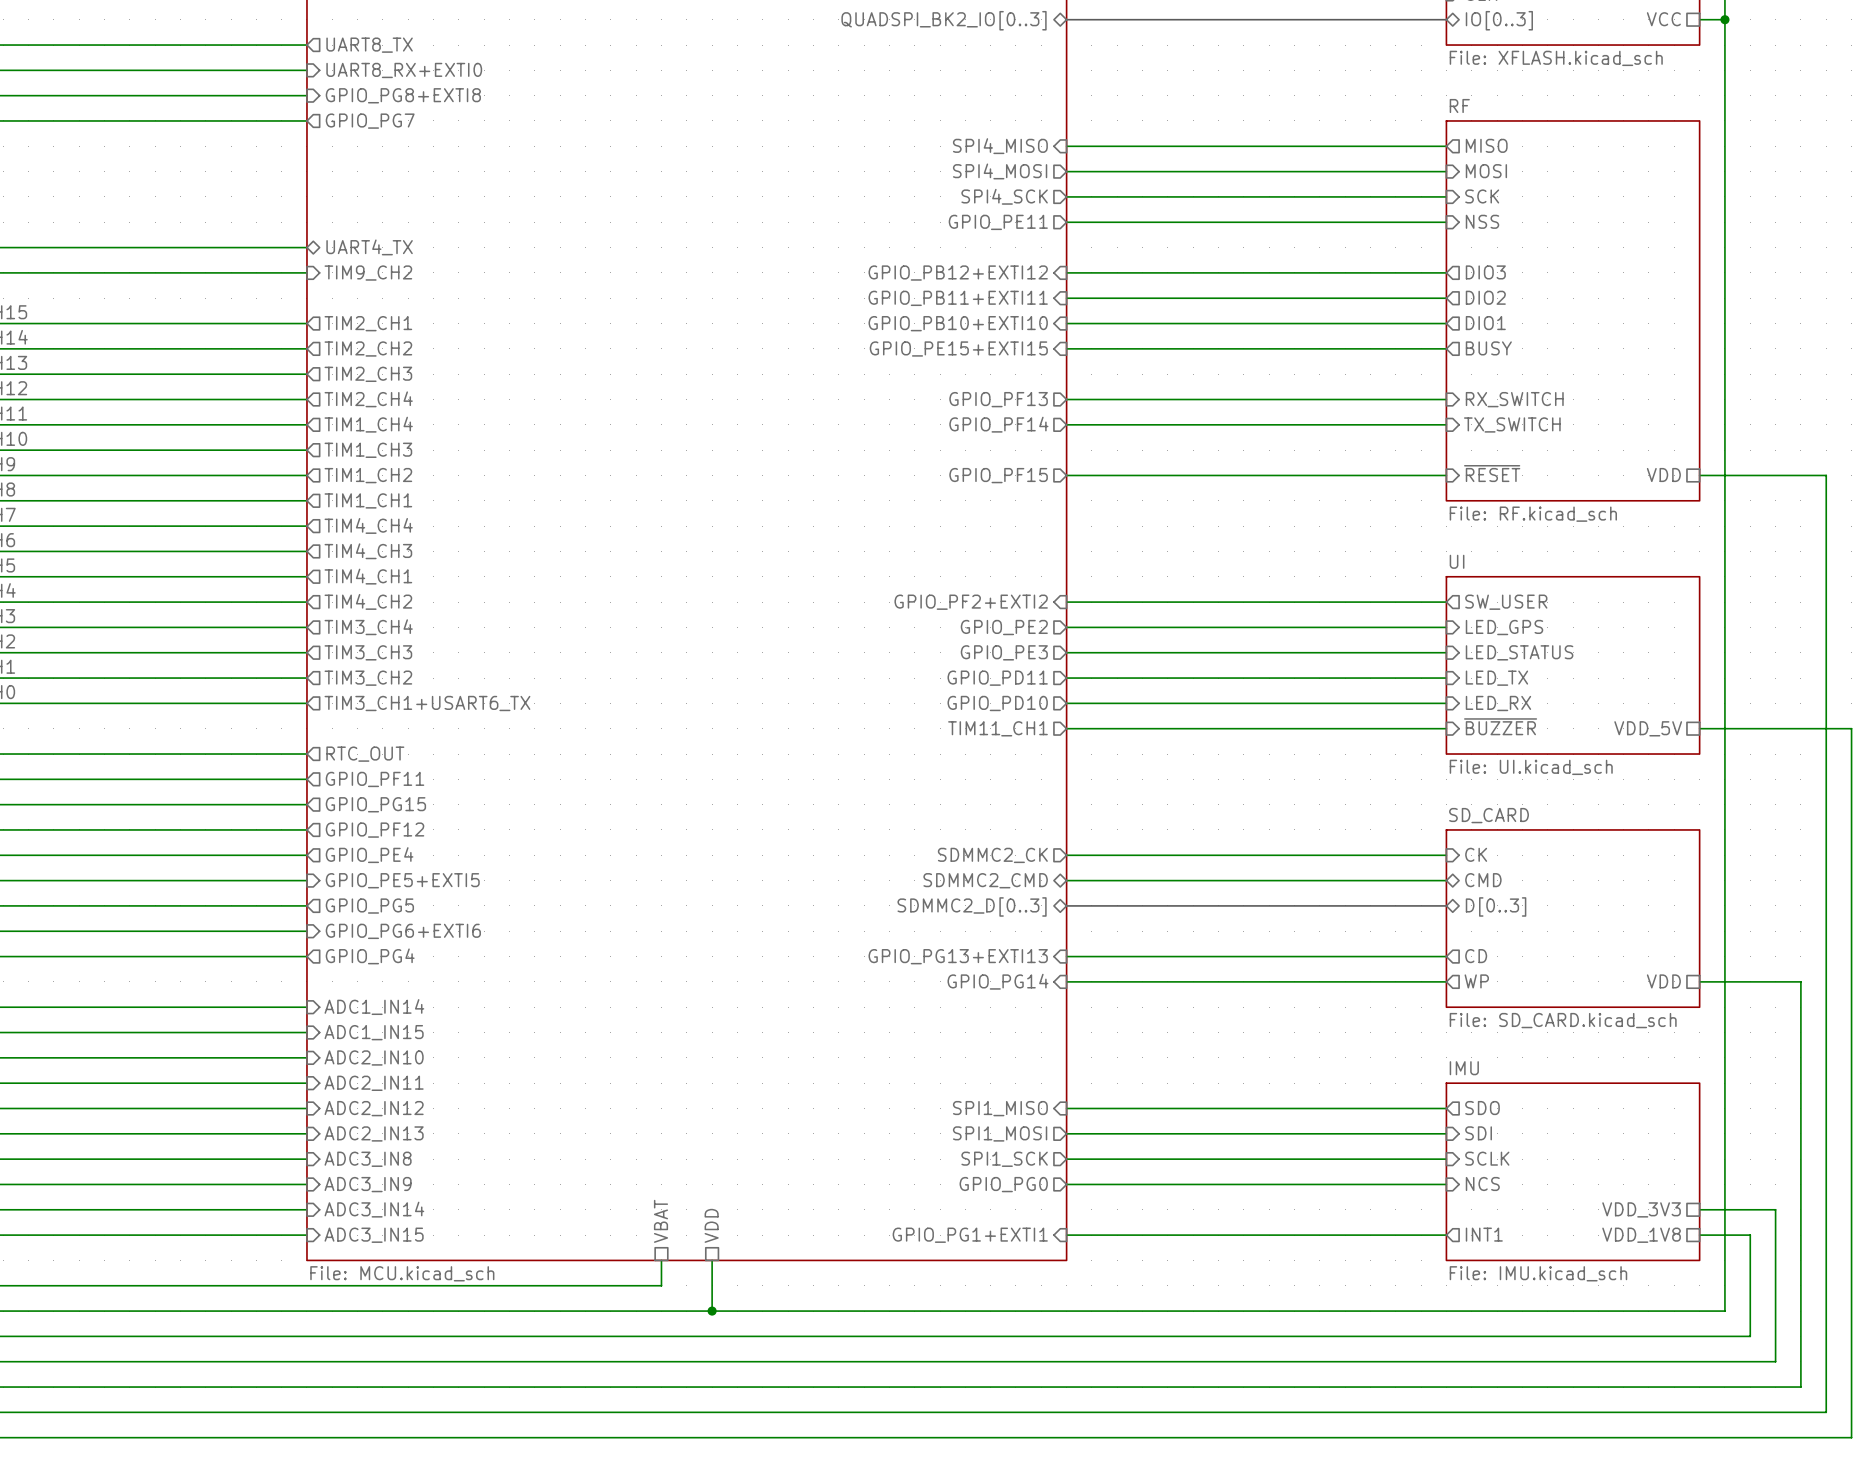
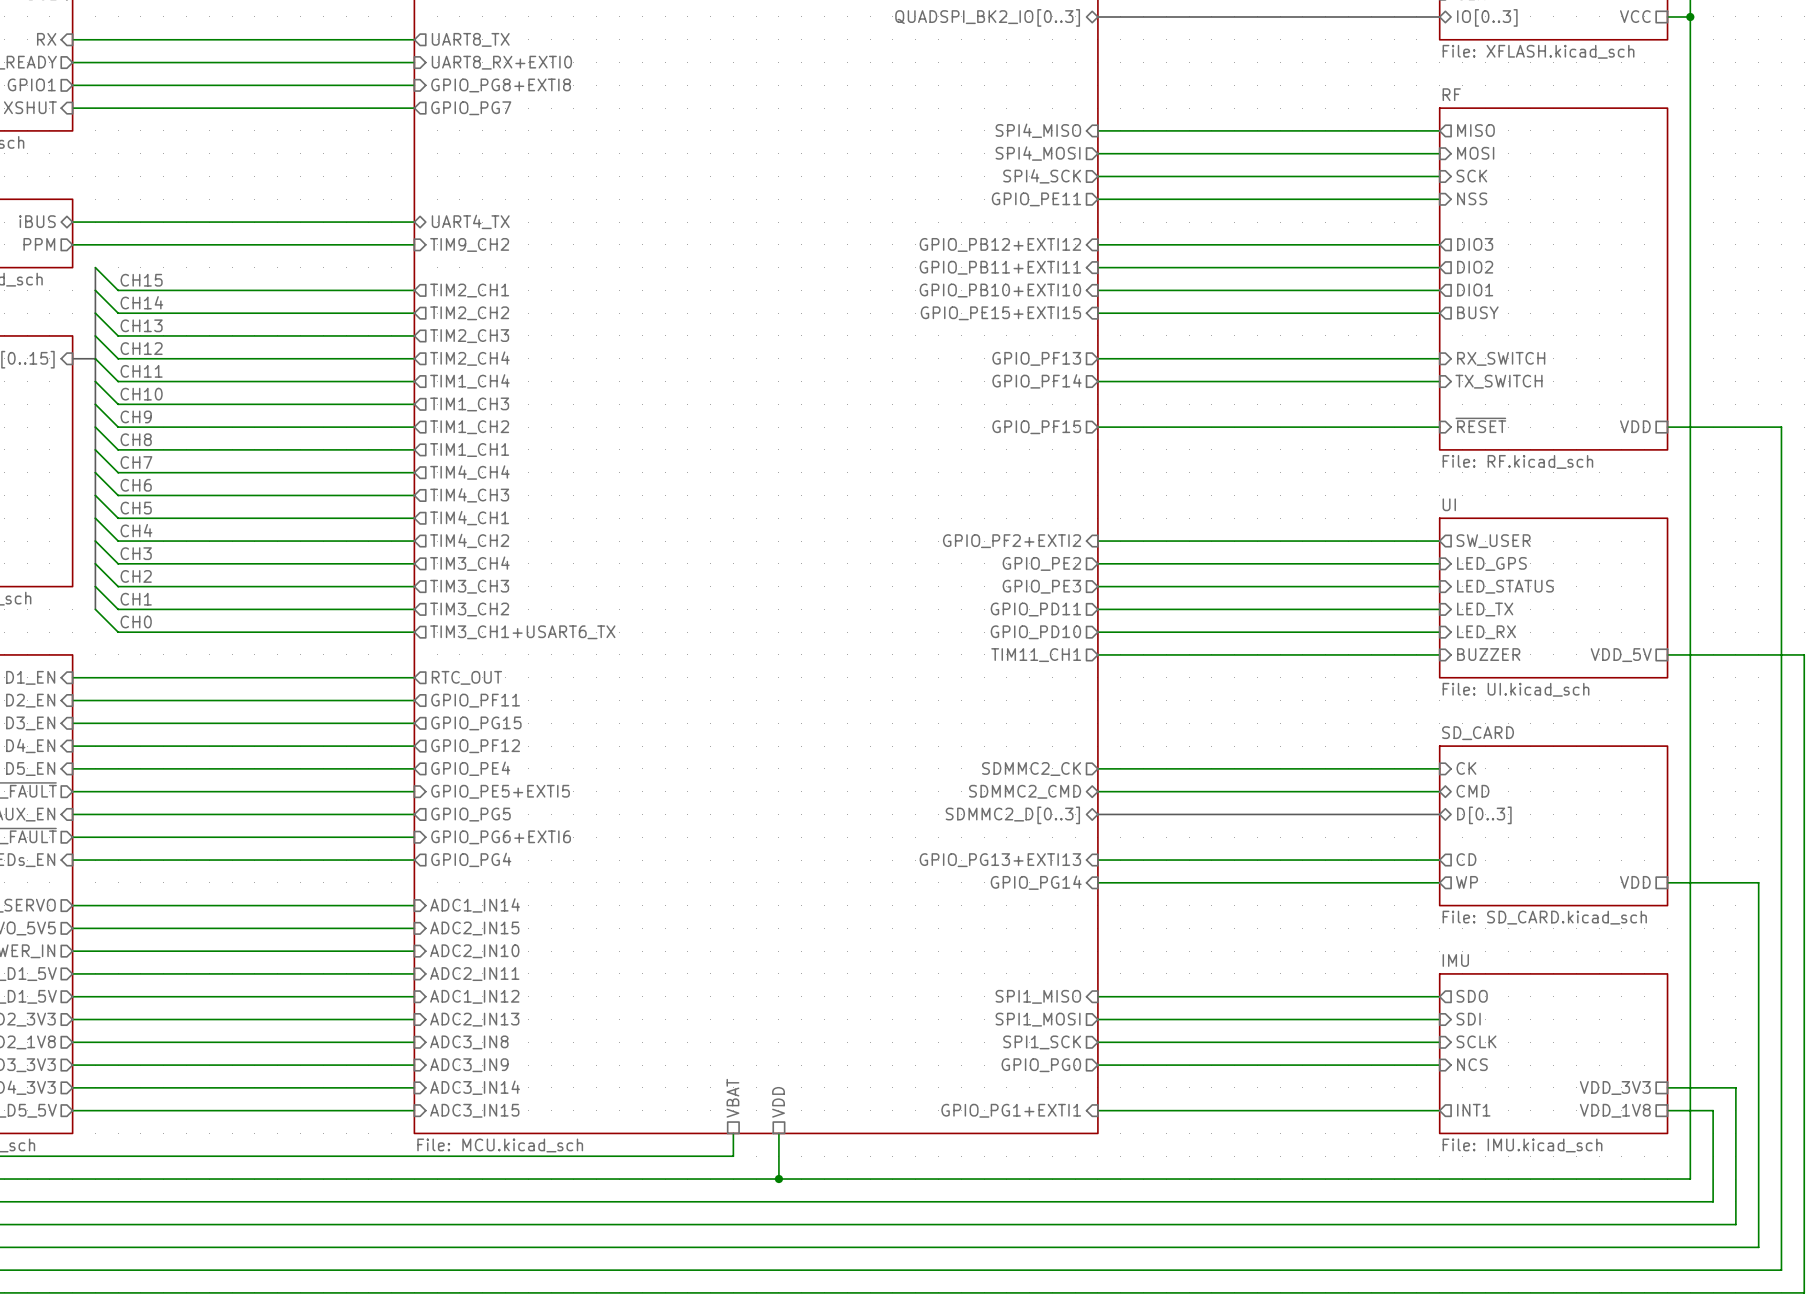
sheet pin: ~{BUZZER} (1500, 726) -> BUZZER (1488, 654)
sheet pin: ADC1_IN15 (374, 1032) -> ADC2_IN15 (474, 928)
sheet pin: ADC2_IN12 (374, 1108) -> ADC1_IN12 (474, 996)

